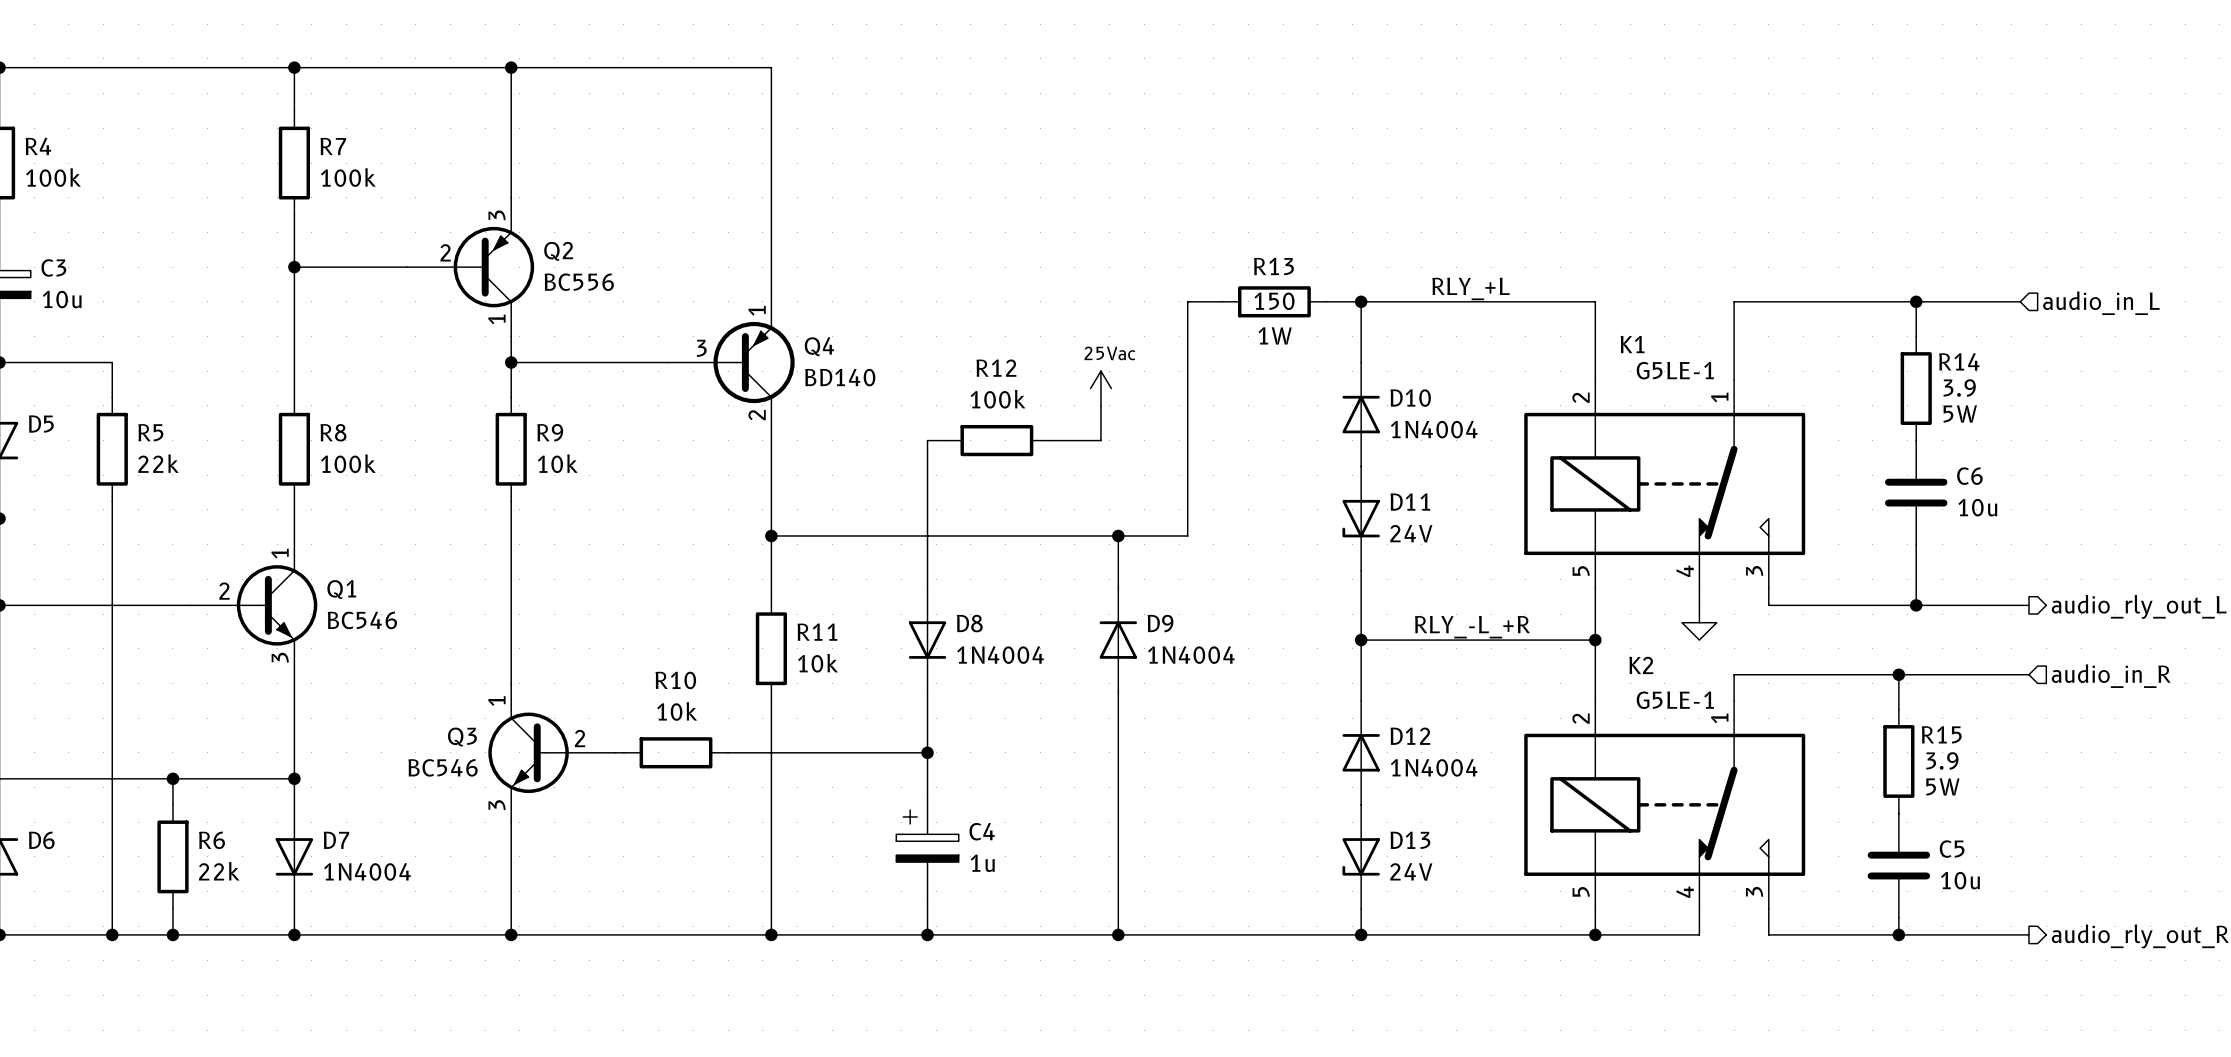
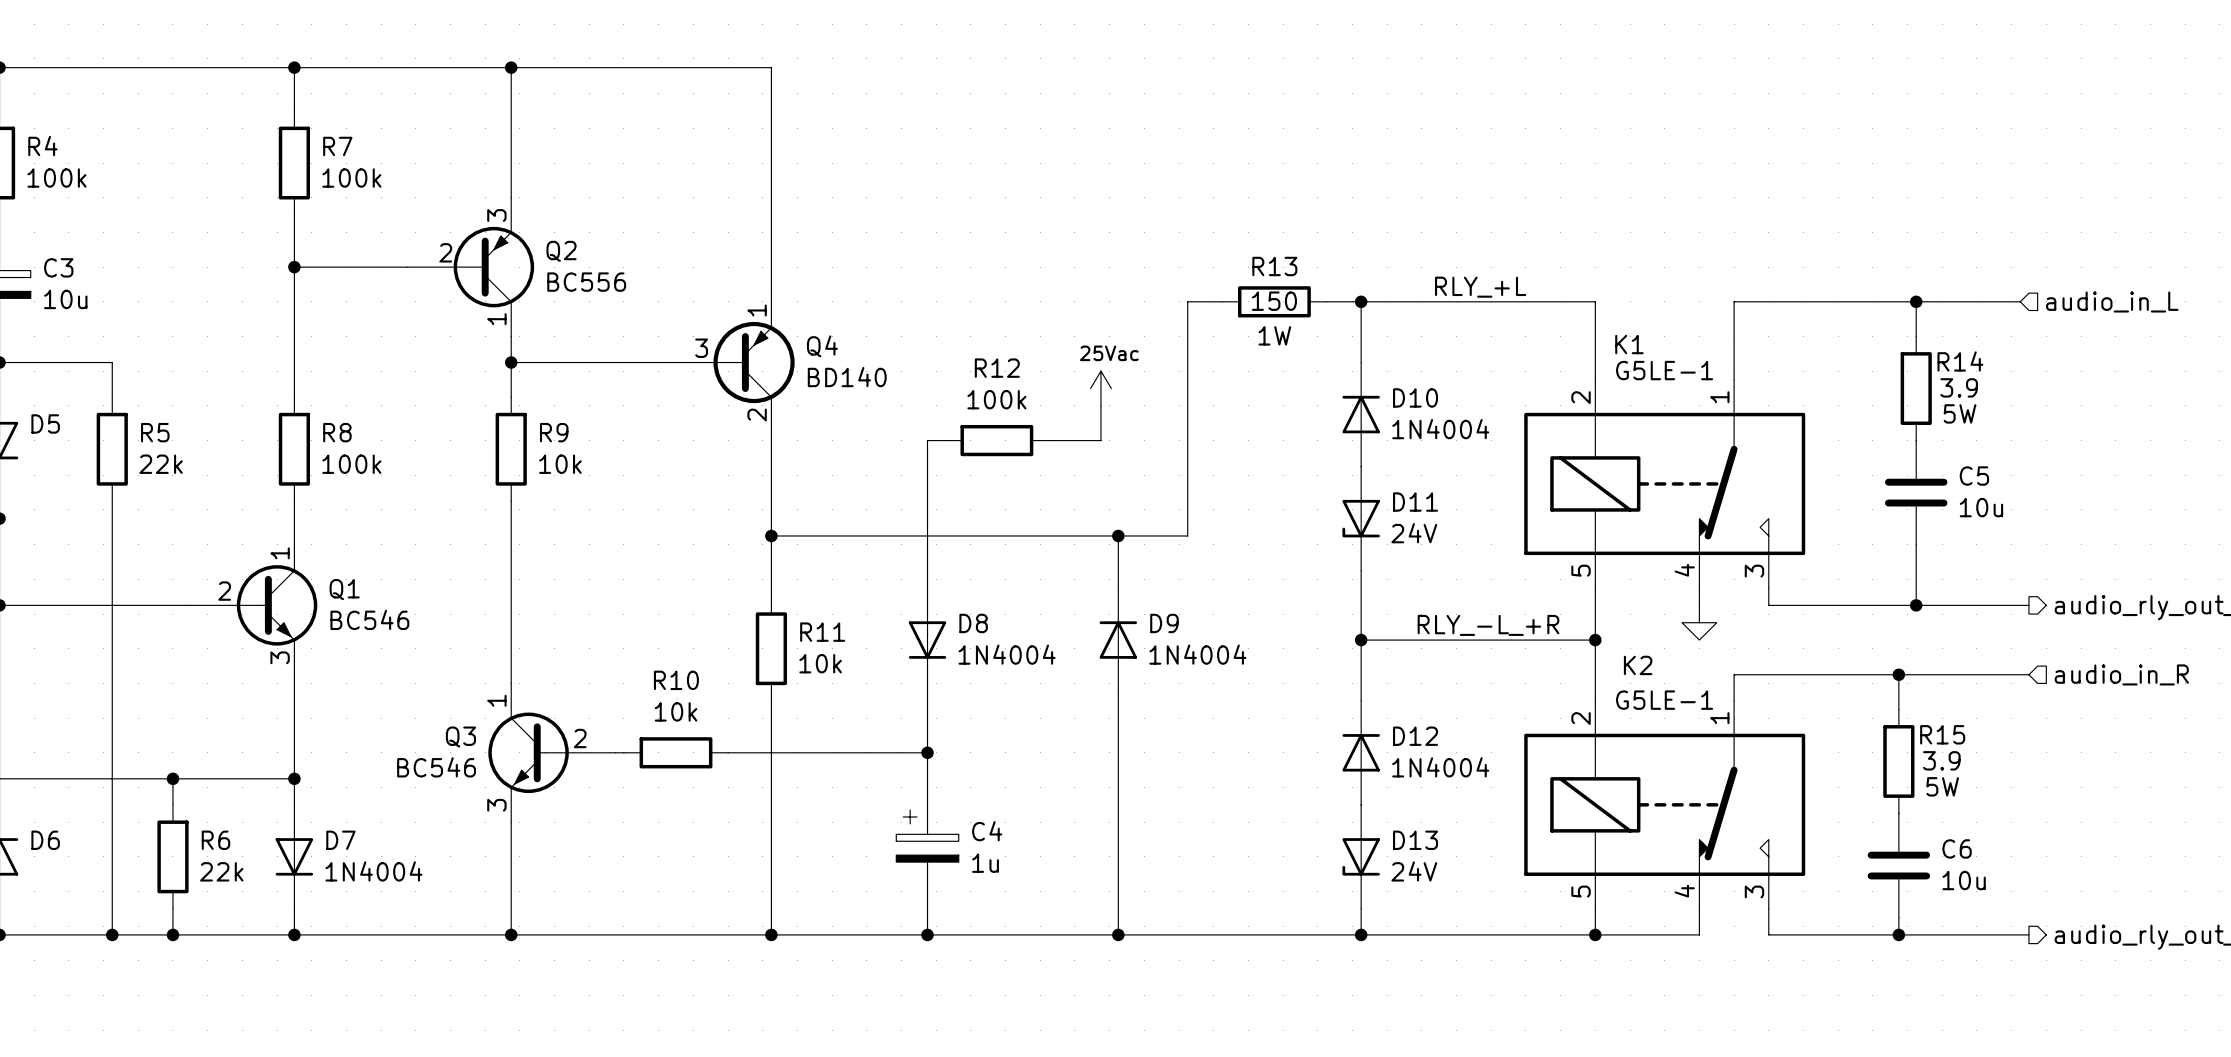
C6 name: C6 (1969, 476) -> C5 (1974, 476)
C5 name: C5 (1952, 849) -> C6 (1957, 848)

